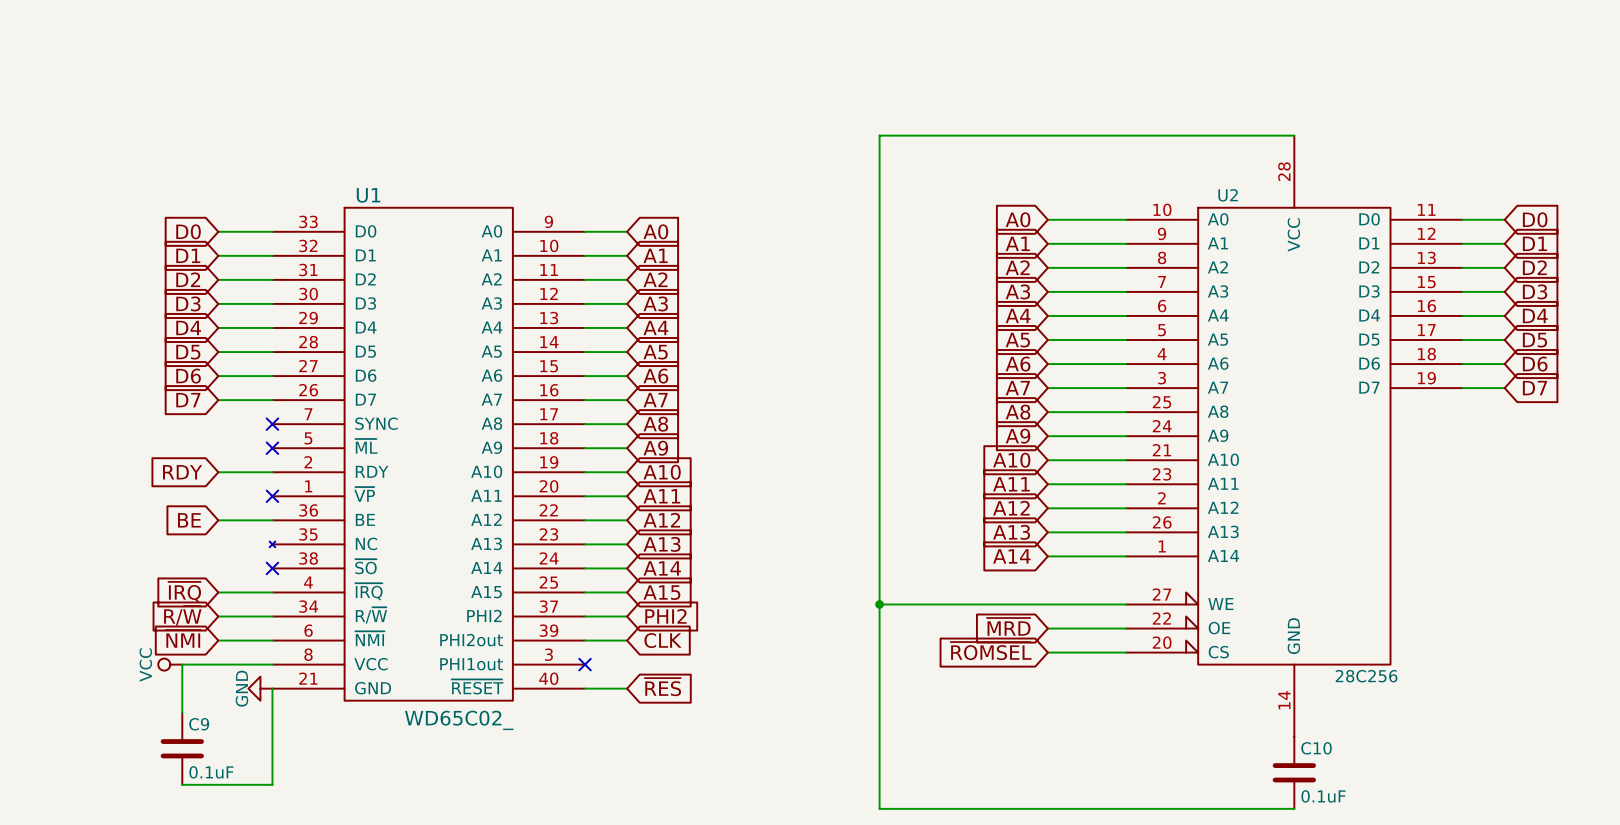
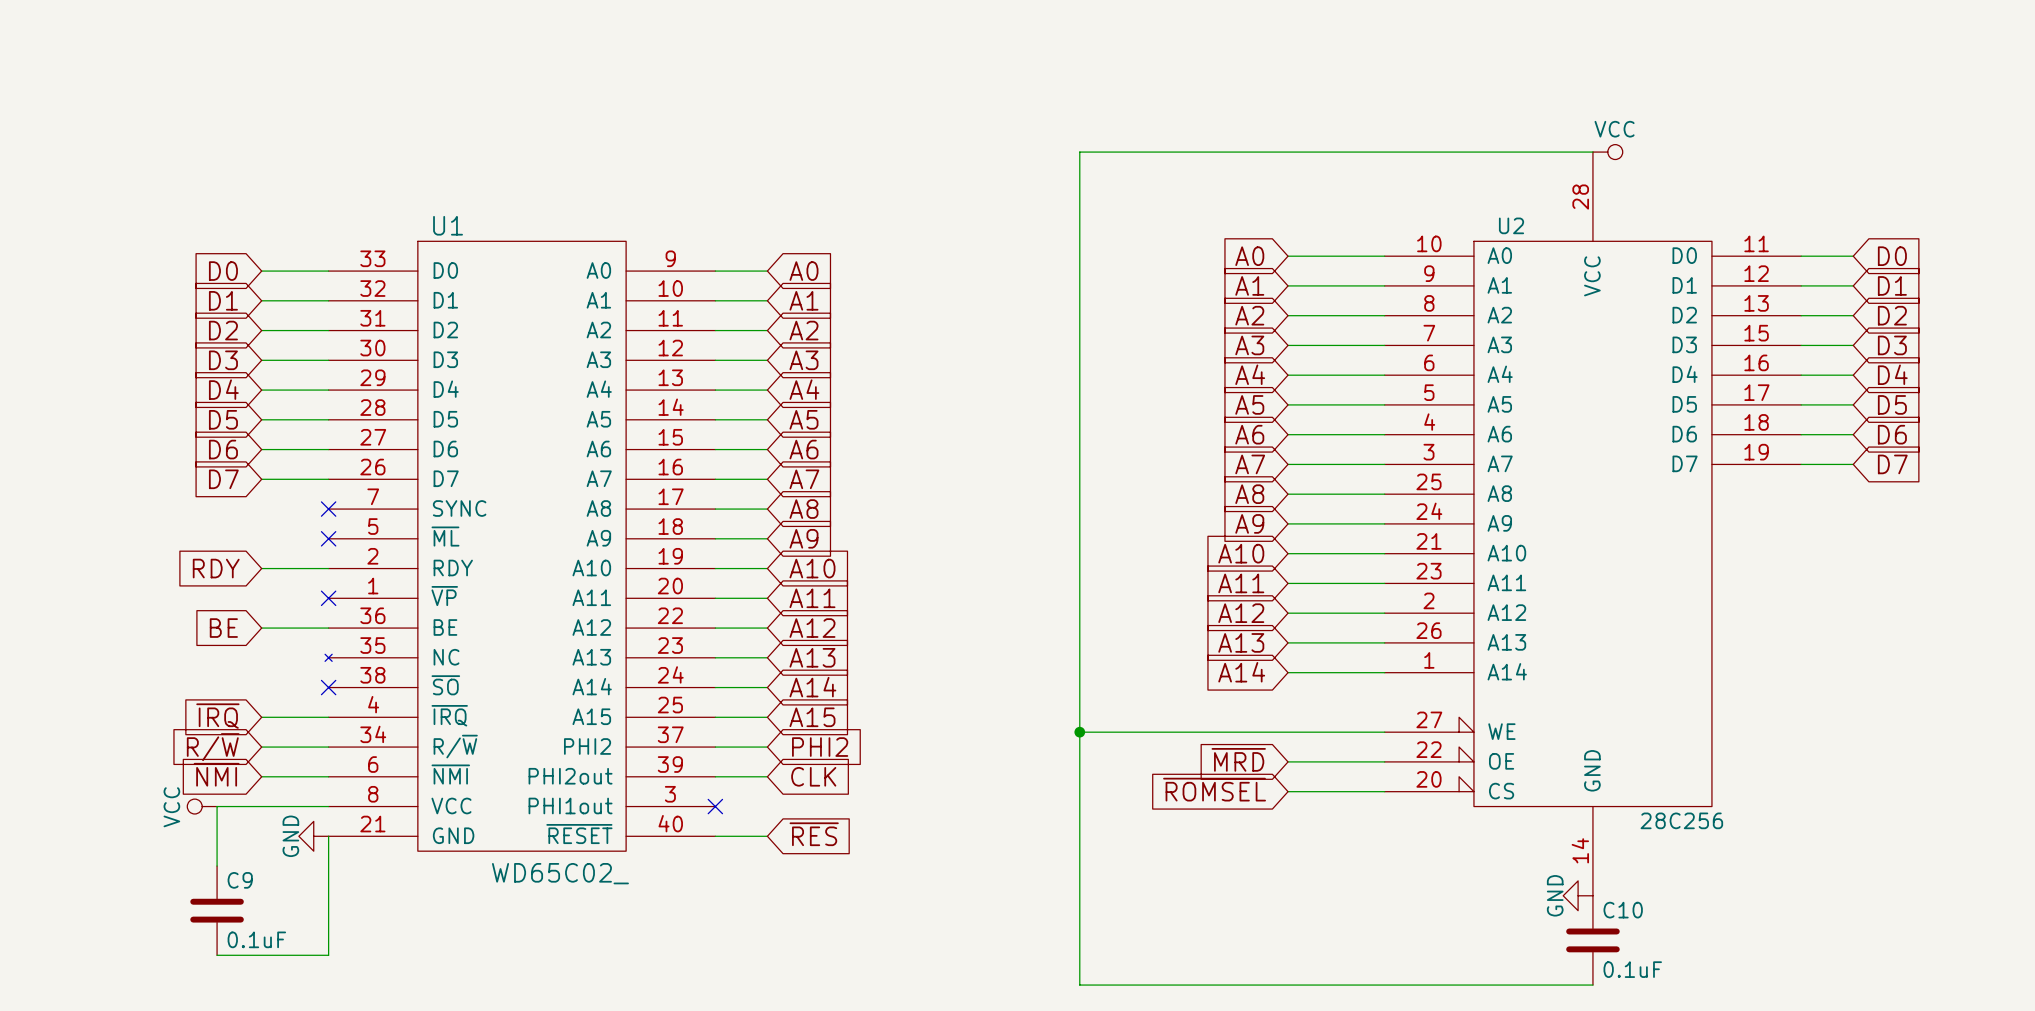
power symbol: none -> VCC (1607, 152)
power symbol: none -> GND (1578, 895)

